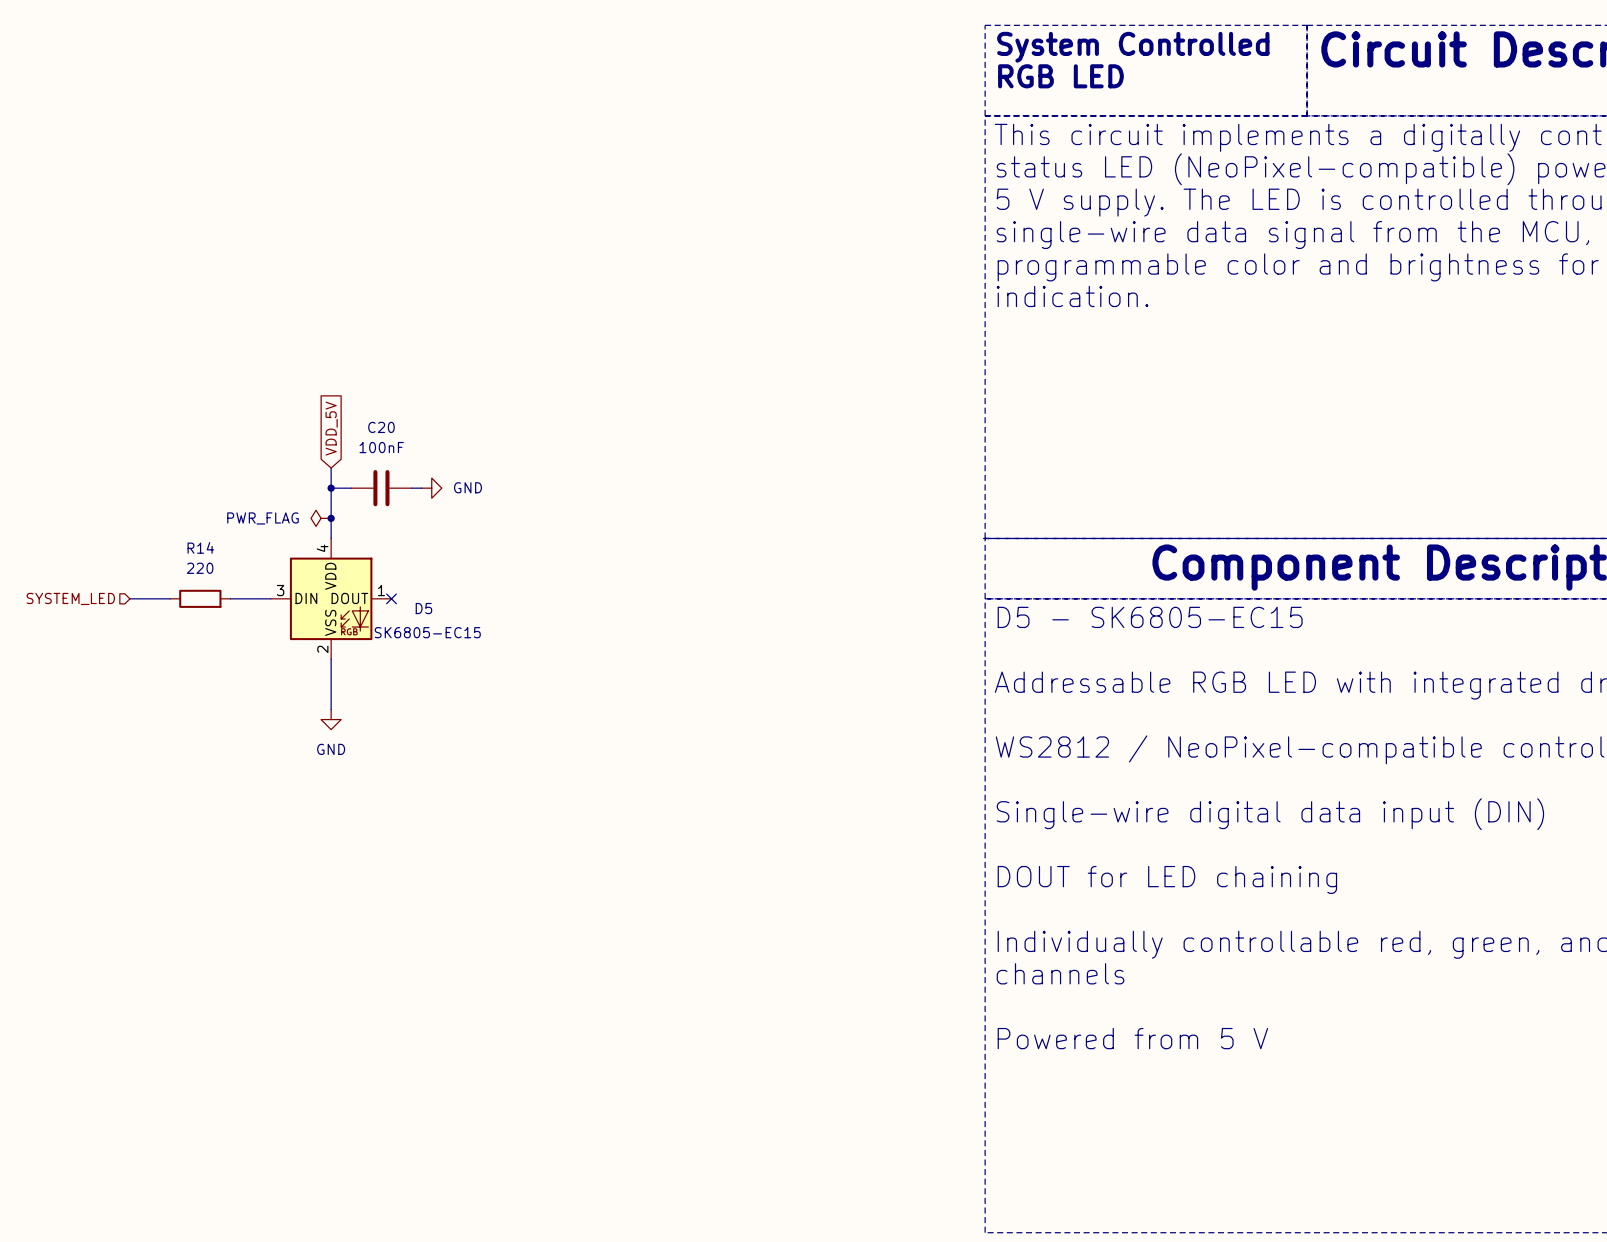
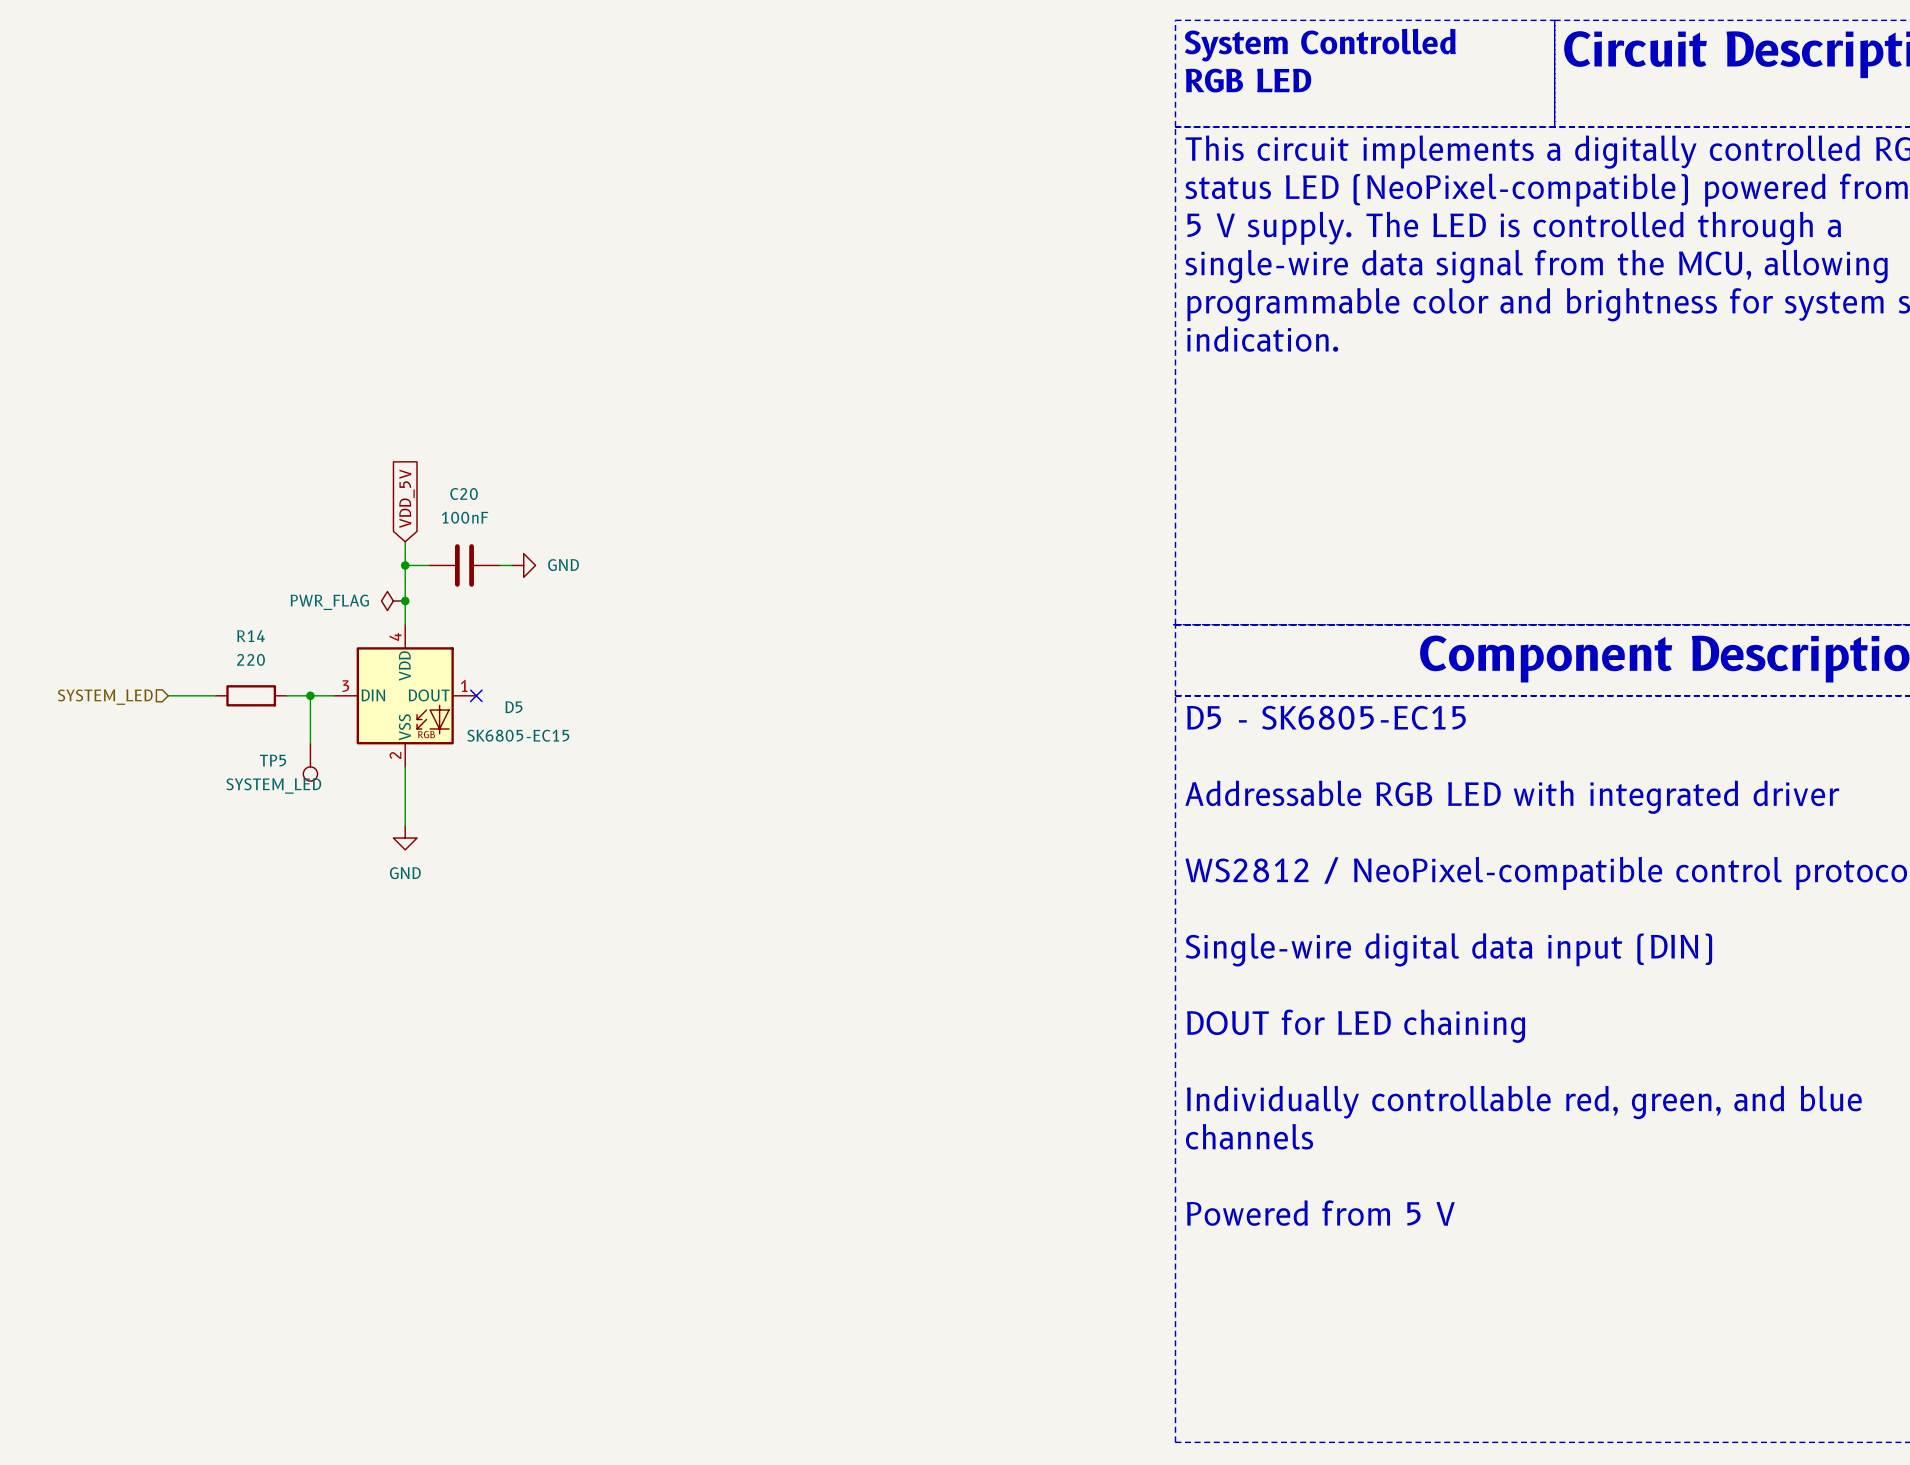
wire: none -> (310, 695) (310, 743)
junction: none -> (310, 695)
TP5: none -> SYSTEM_LED (310, 762)

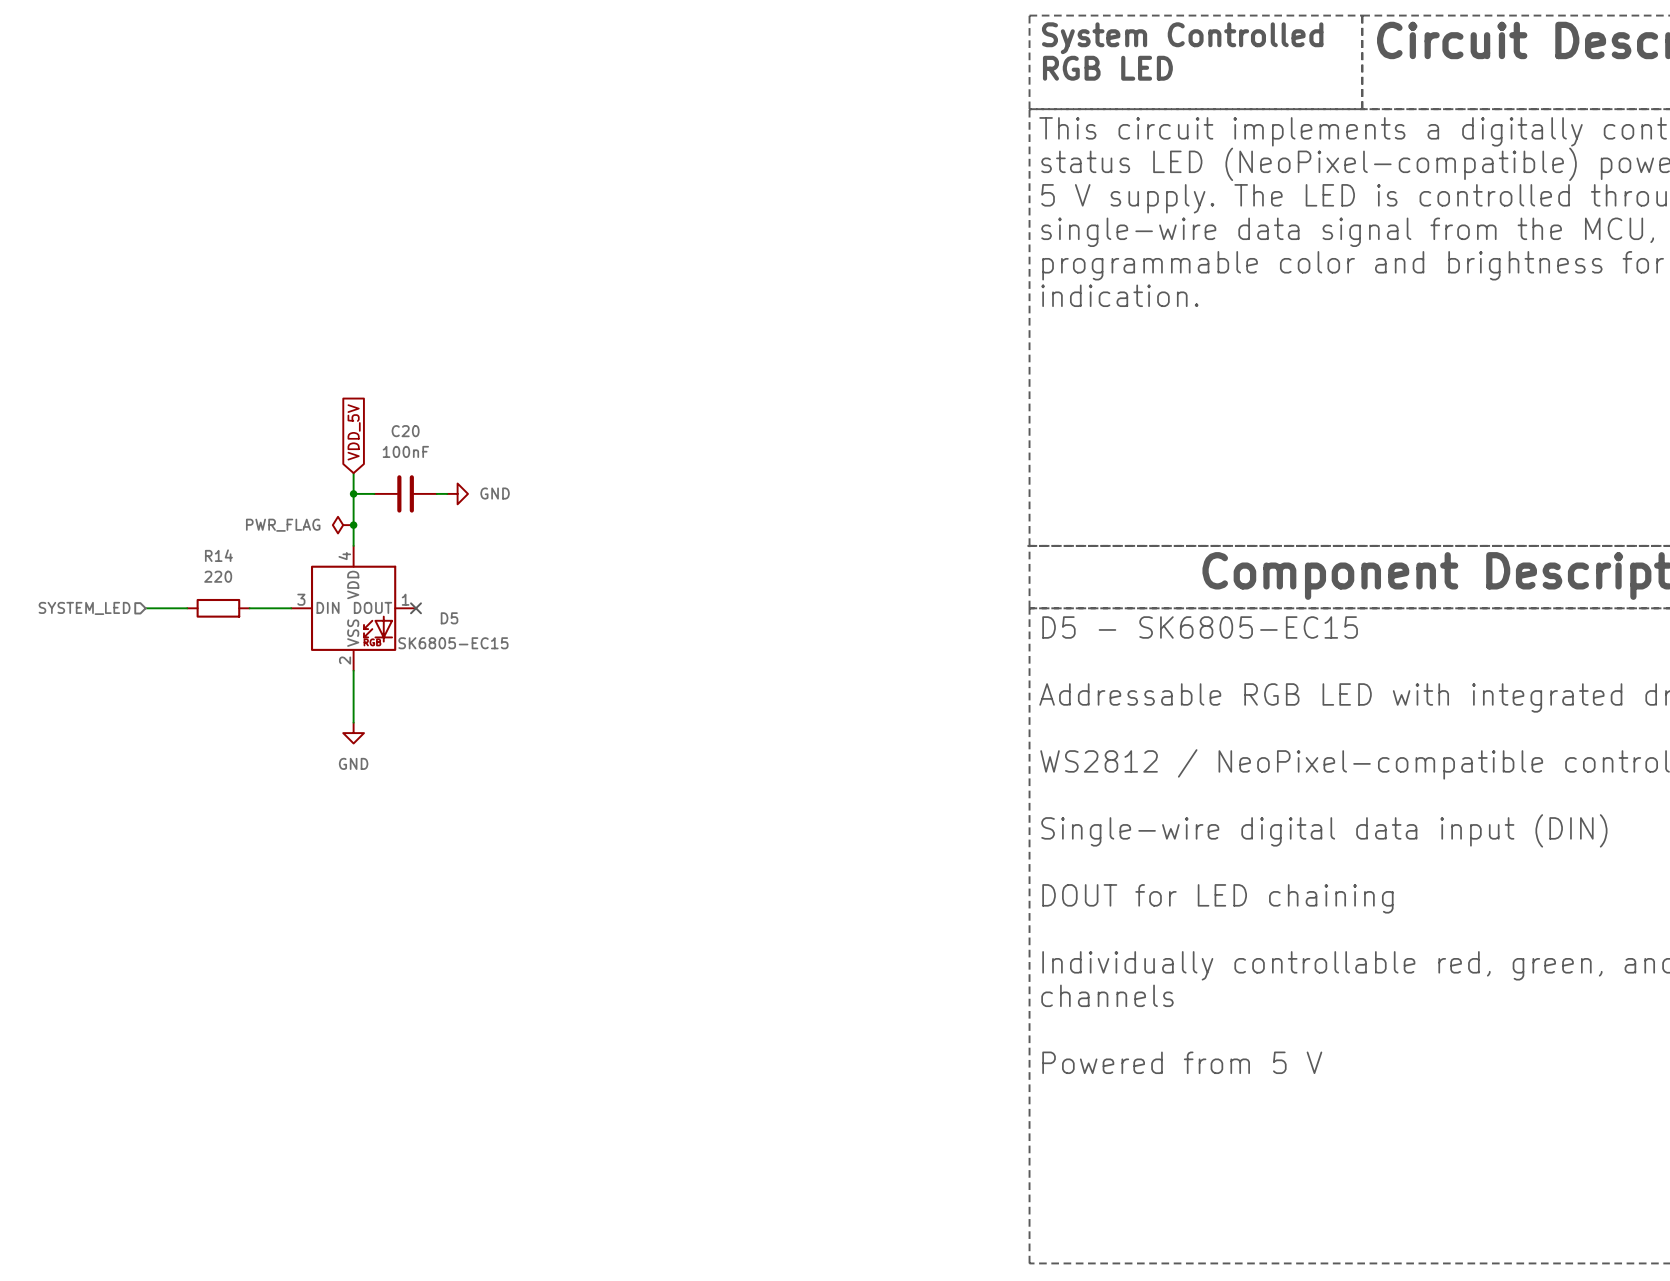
wire: (310, 695) (310, 743) -> none
junction: (310, 695) -> none
TP5: SYSTEM_LED (310, 762) -> none

